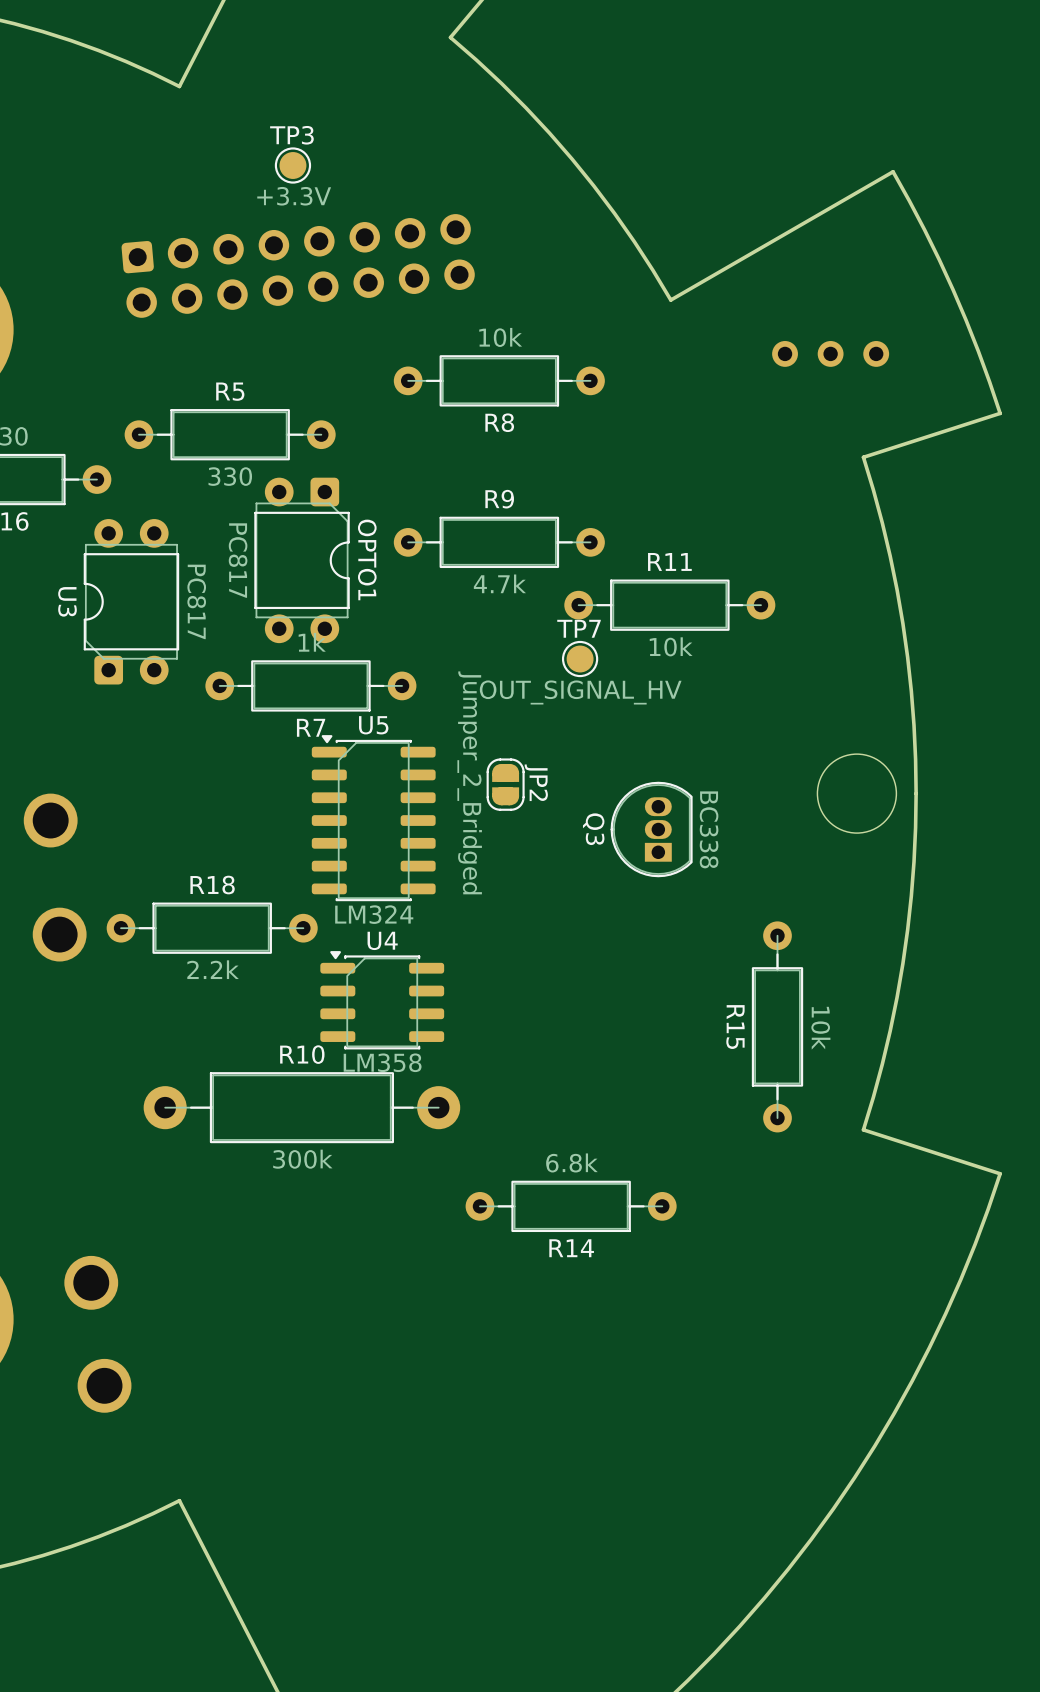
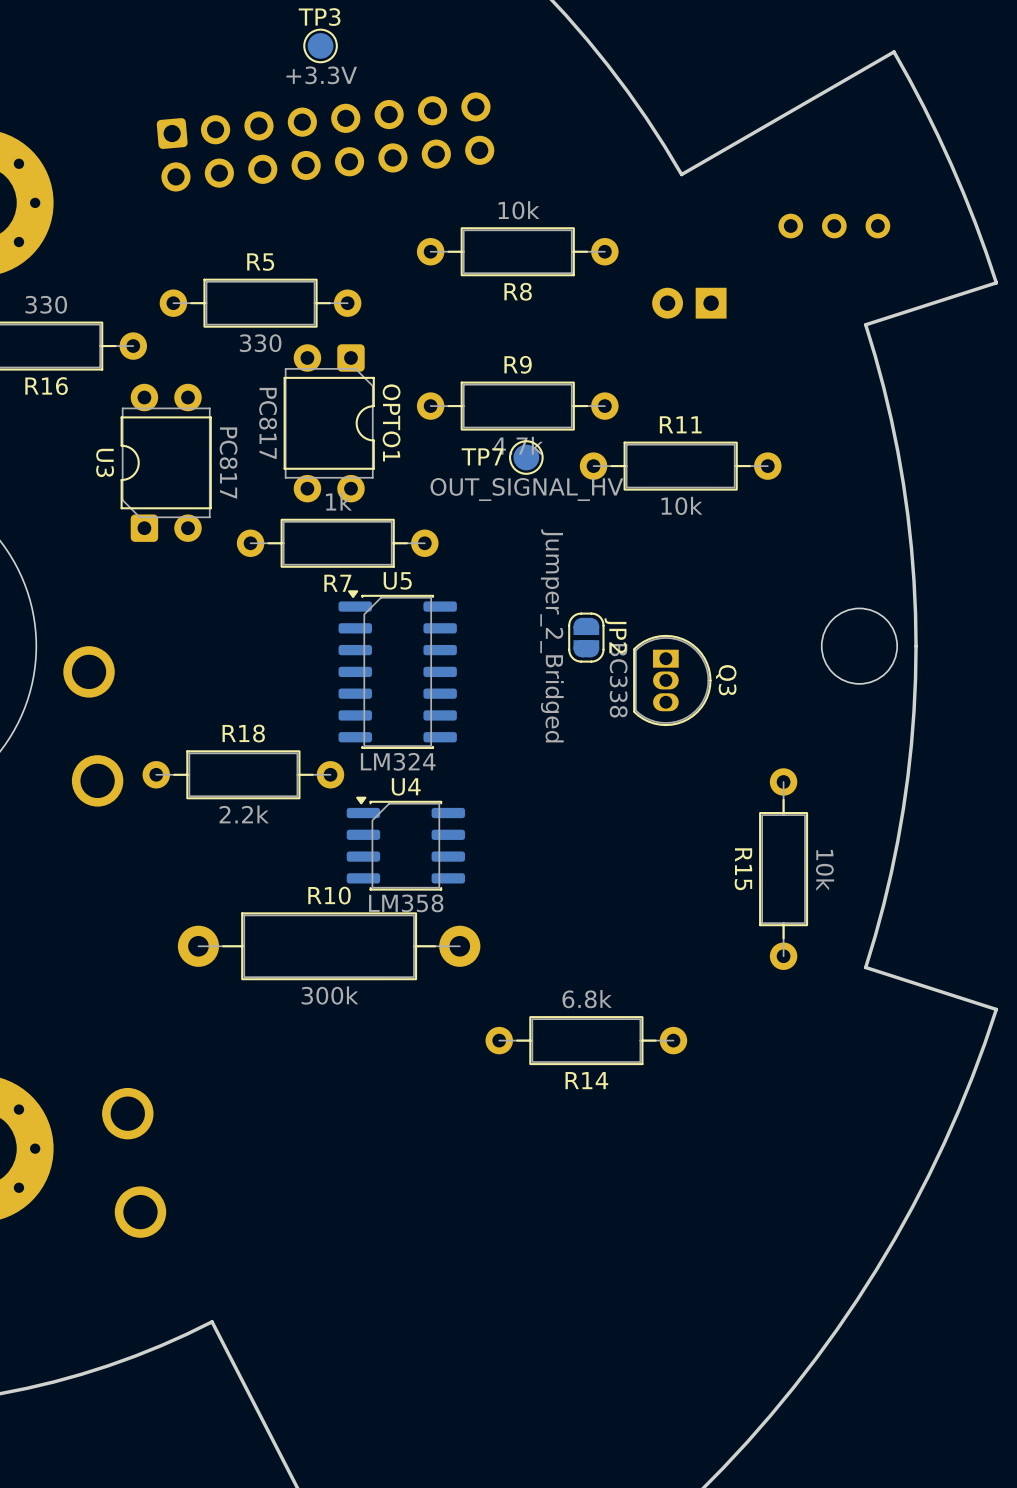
part: none -> (689, 303)
TP7 name position: TP7 (579, 628) -> TP7 (482, 456)
TP7 position: (580, 659) -> (526, 457)
JP2 position: (505, 784) -> (586, 637)
Q3 rotation: 0° (651, 829) -> 180° (672, 680)

